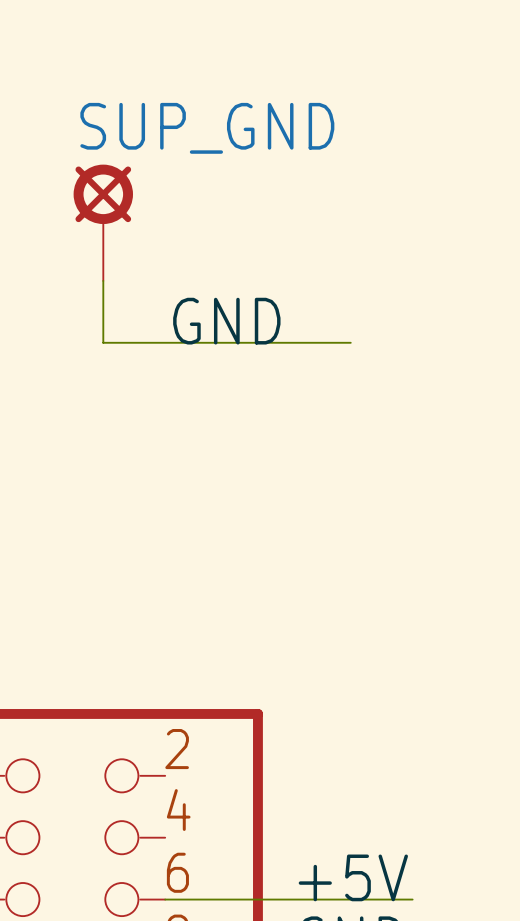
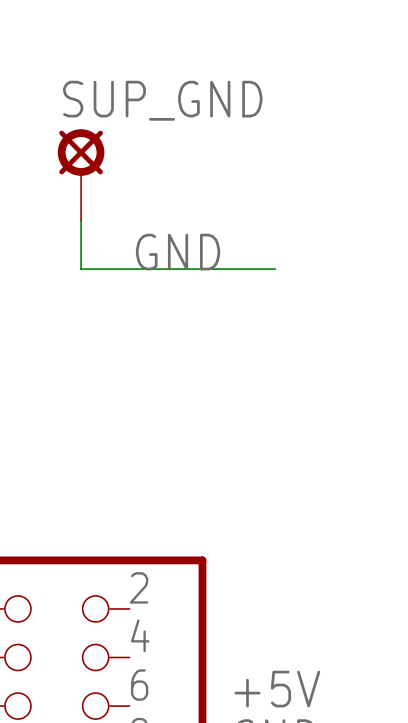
wire: (165, 899) (412, 899) -> none

